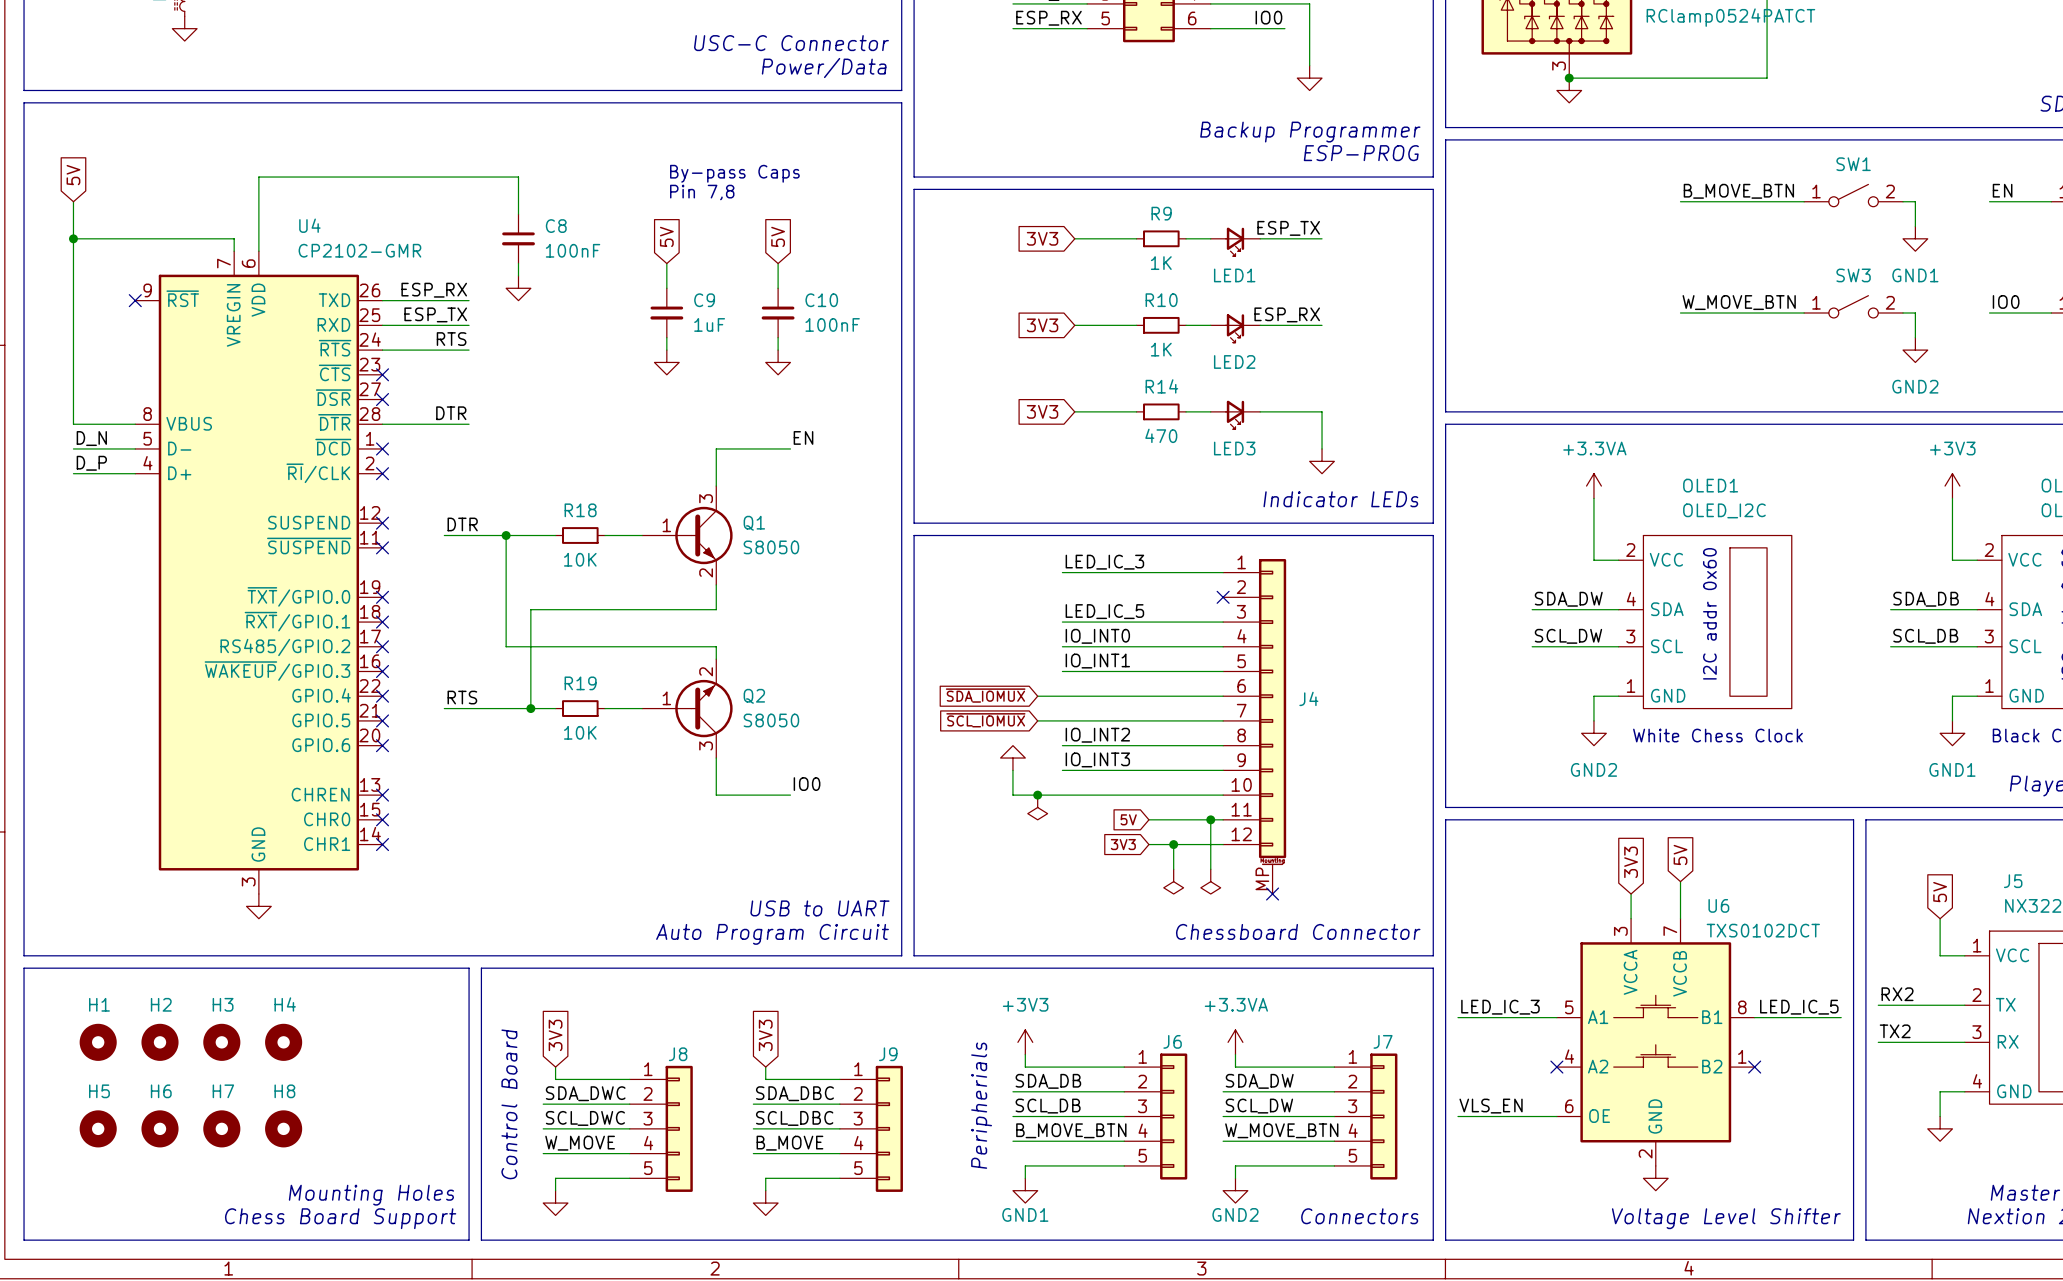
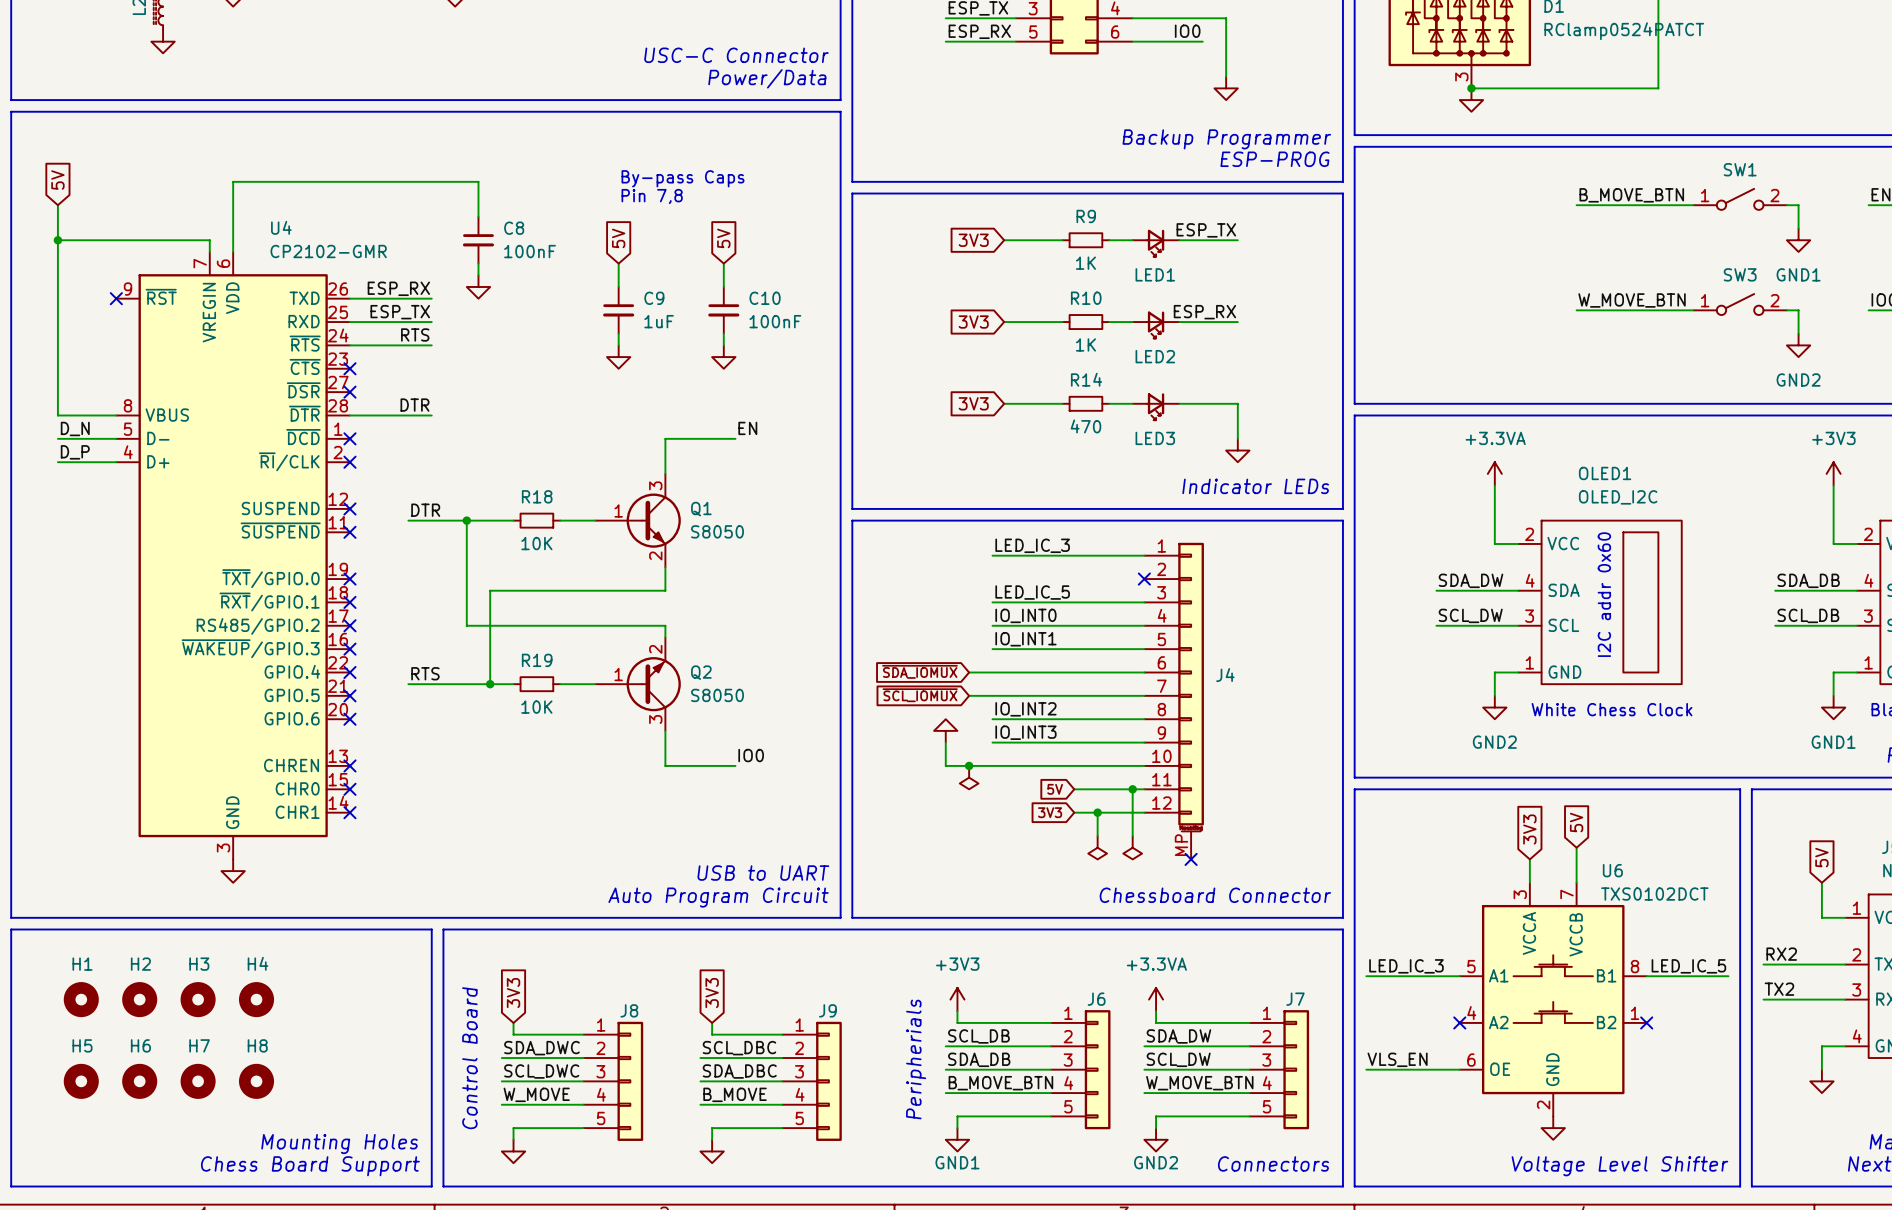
label: SDA_DB (1048, 1081) -> SCL_DB (978, 1036)
label: SDA_DBC (794, 1093) -> SCL_DBC (739, 1048)
label: SCL_DB (1048, 1106) -> SDA_DB (979, 1059)
label: SCL_DBC (794, 1118) -> SDA_DBC (739, 1071)

